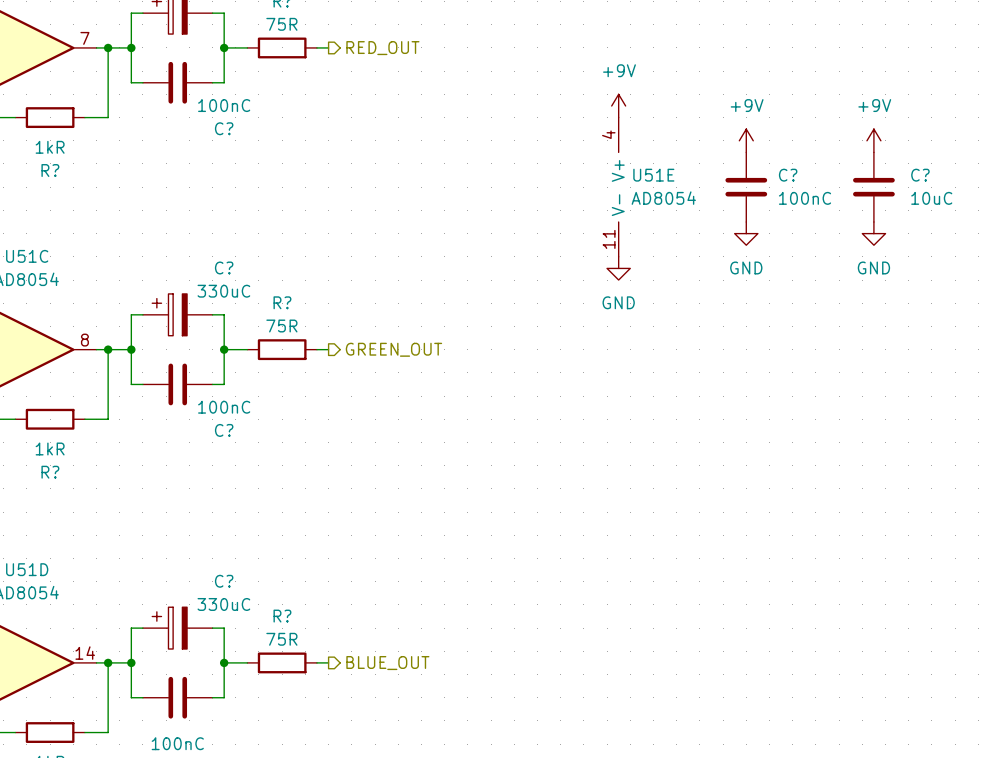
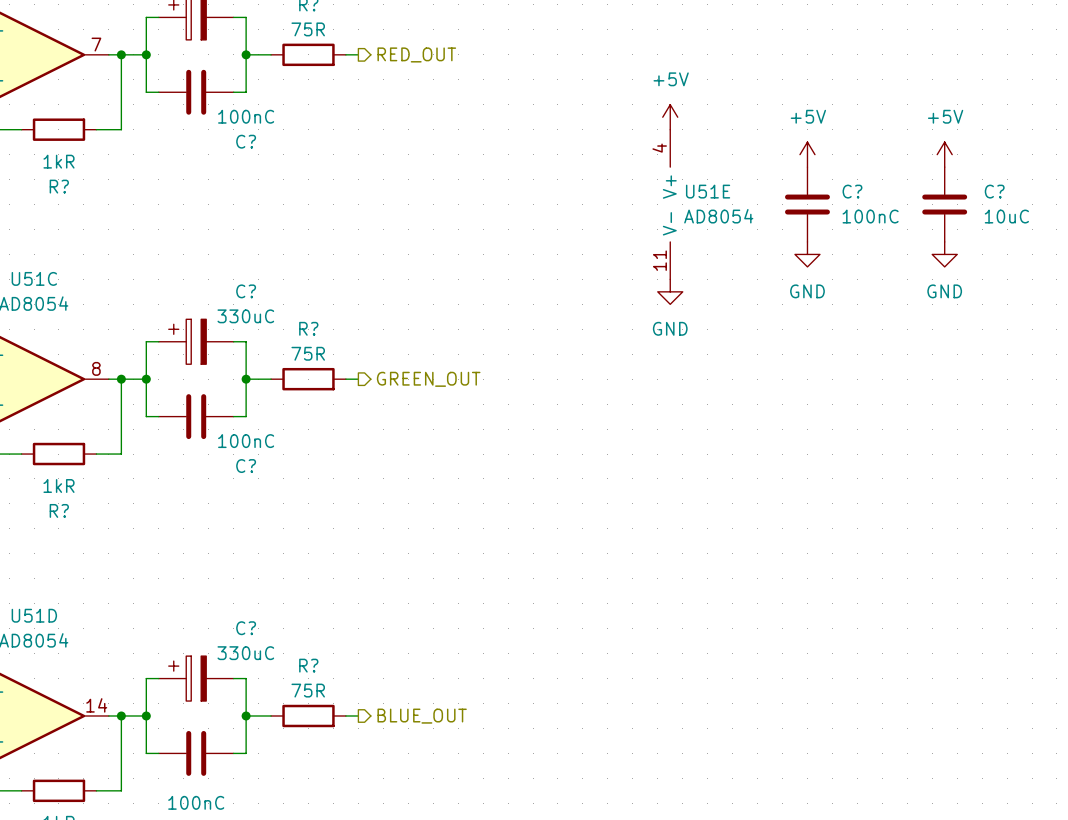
power symbol: +9V (618, 105) -> +5V (670, 117)
power symbol: +9V (746, 140) -> +5V (807, 154)
power symbol: +9V (873, 140) -> +5V (944, 154)

